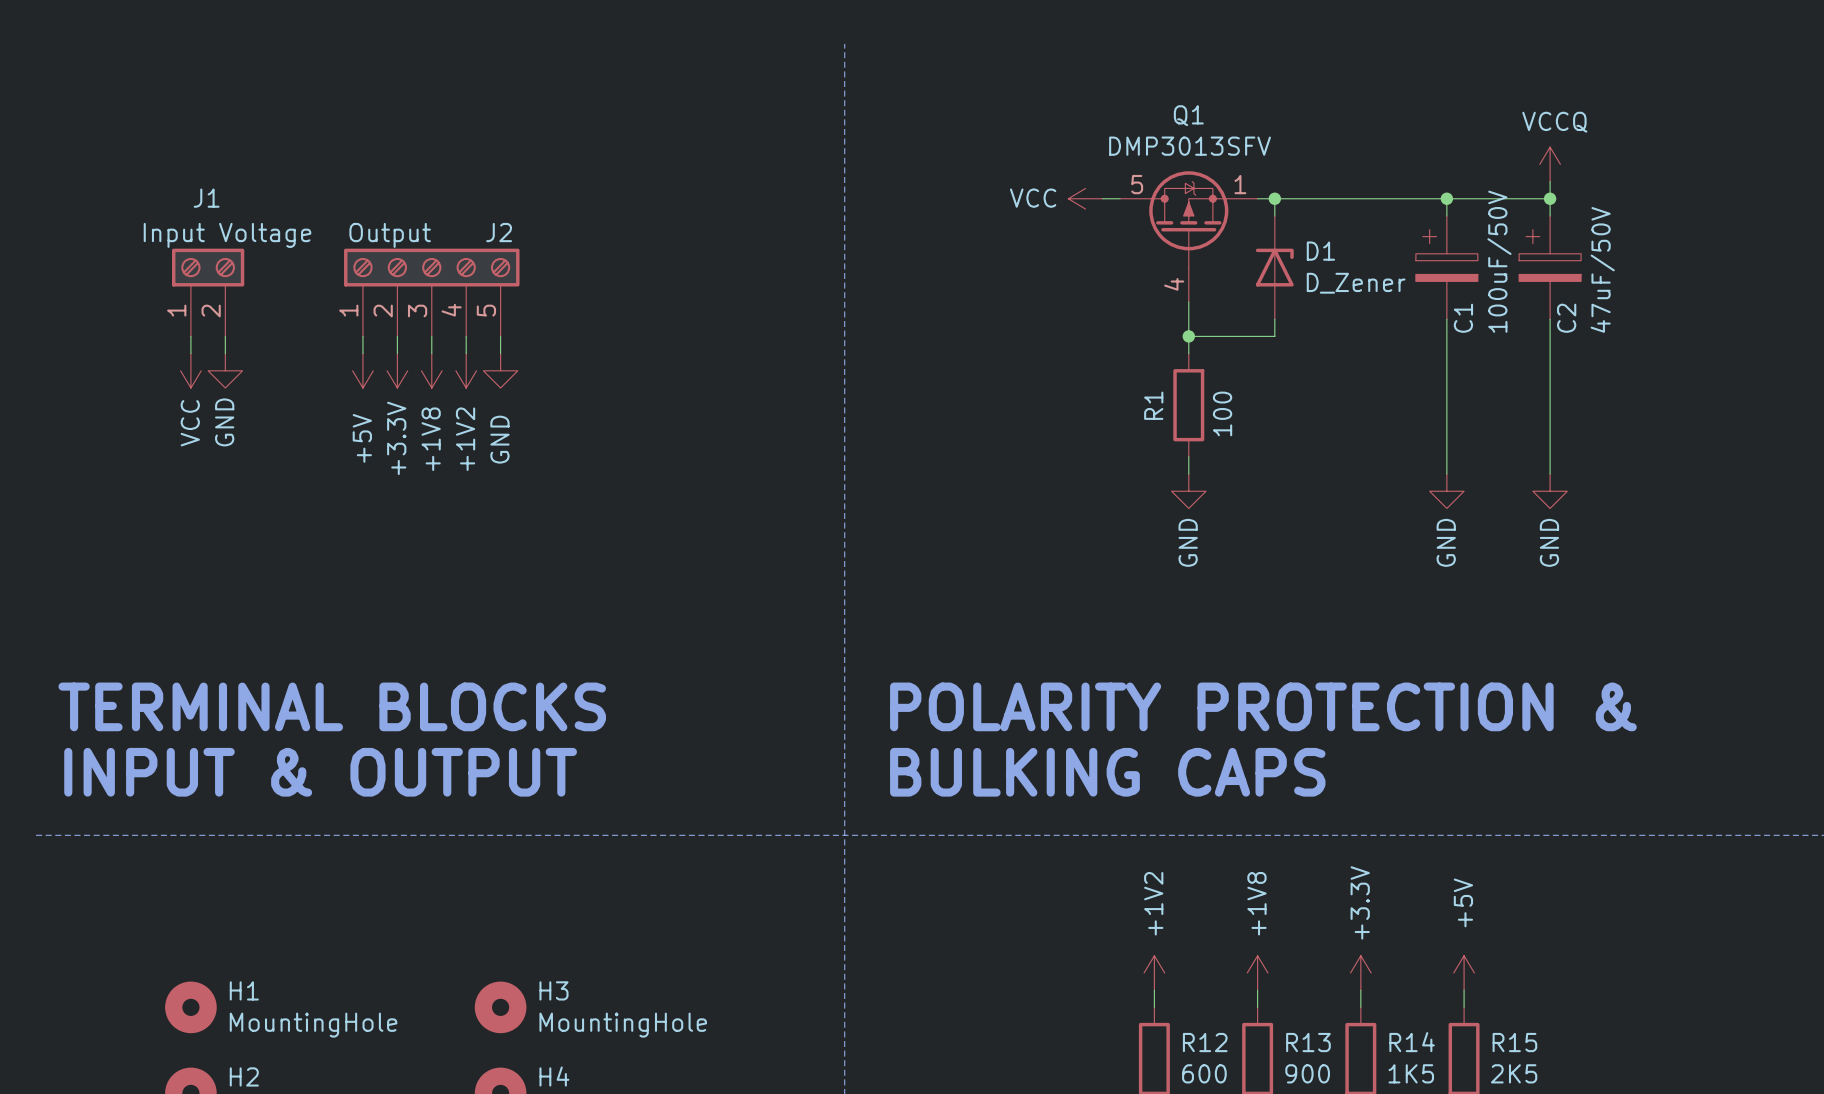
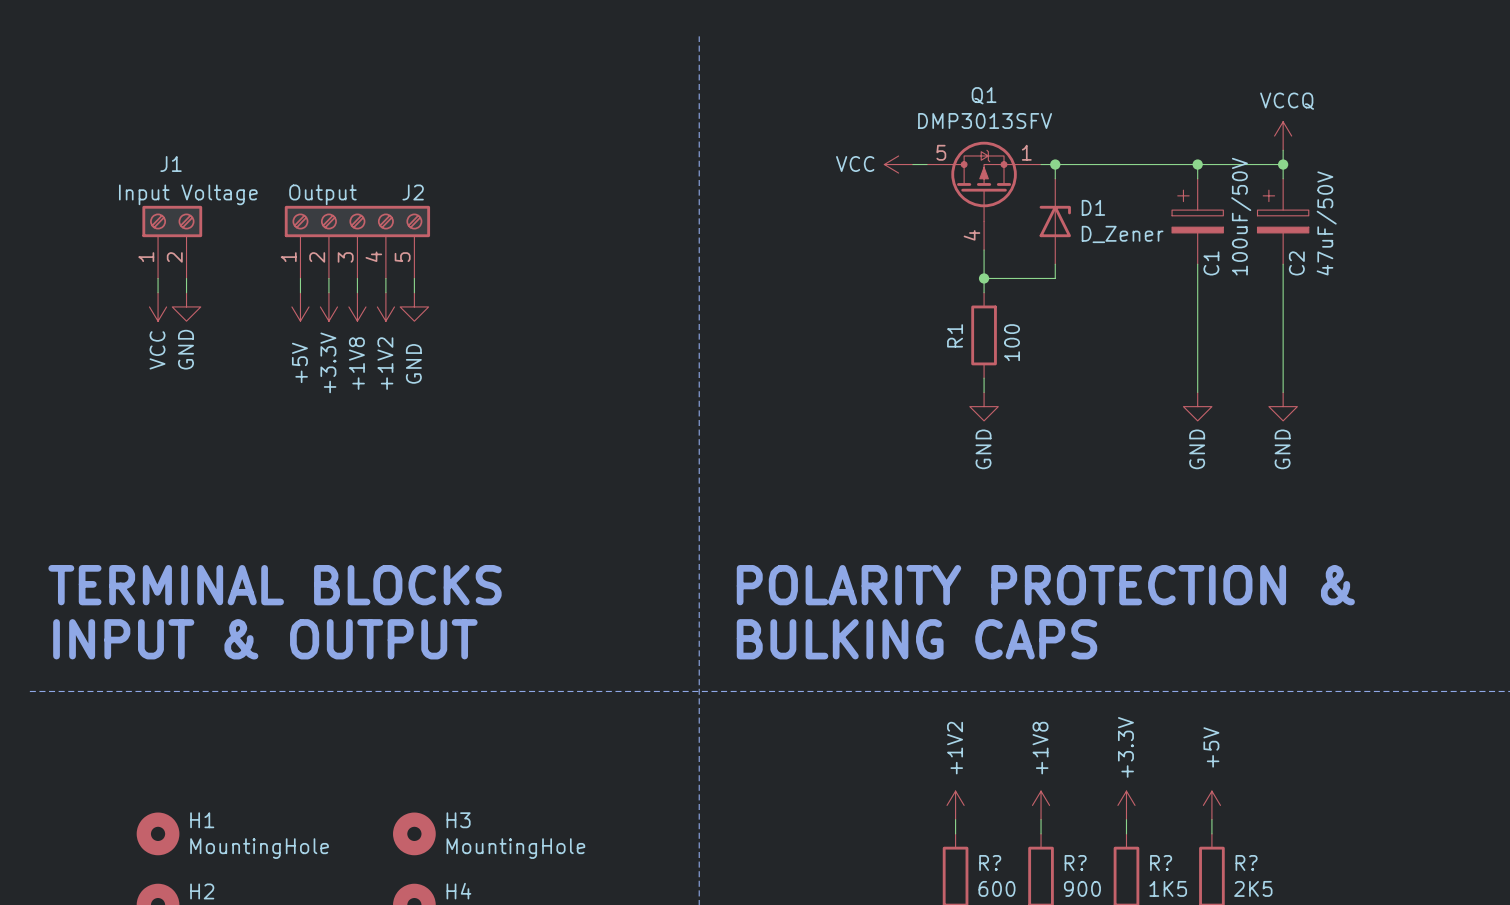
R12 name: R12 (1205, 1042) -> R? (990, 862)
R13 name: R13 (1308, 1042) -> R? (1075, 862)
R14 name: R14 (1412, 1042) -> R? (1161, 862)
R15 name: R15 (1514, 1042) -> R? (1246, 862)

